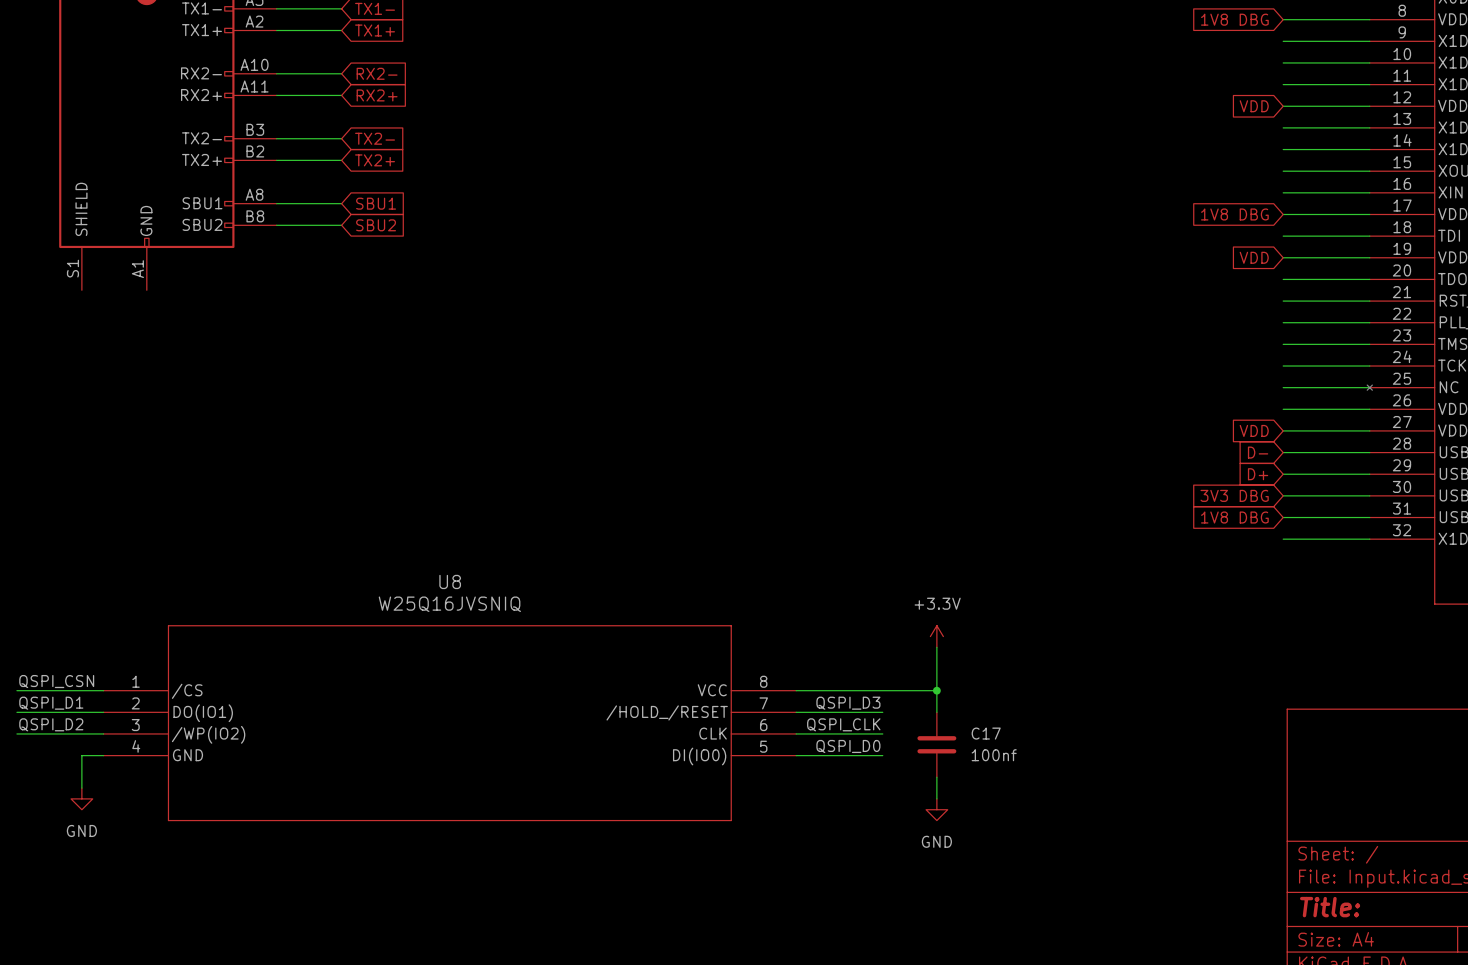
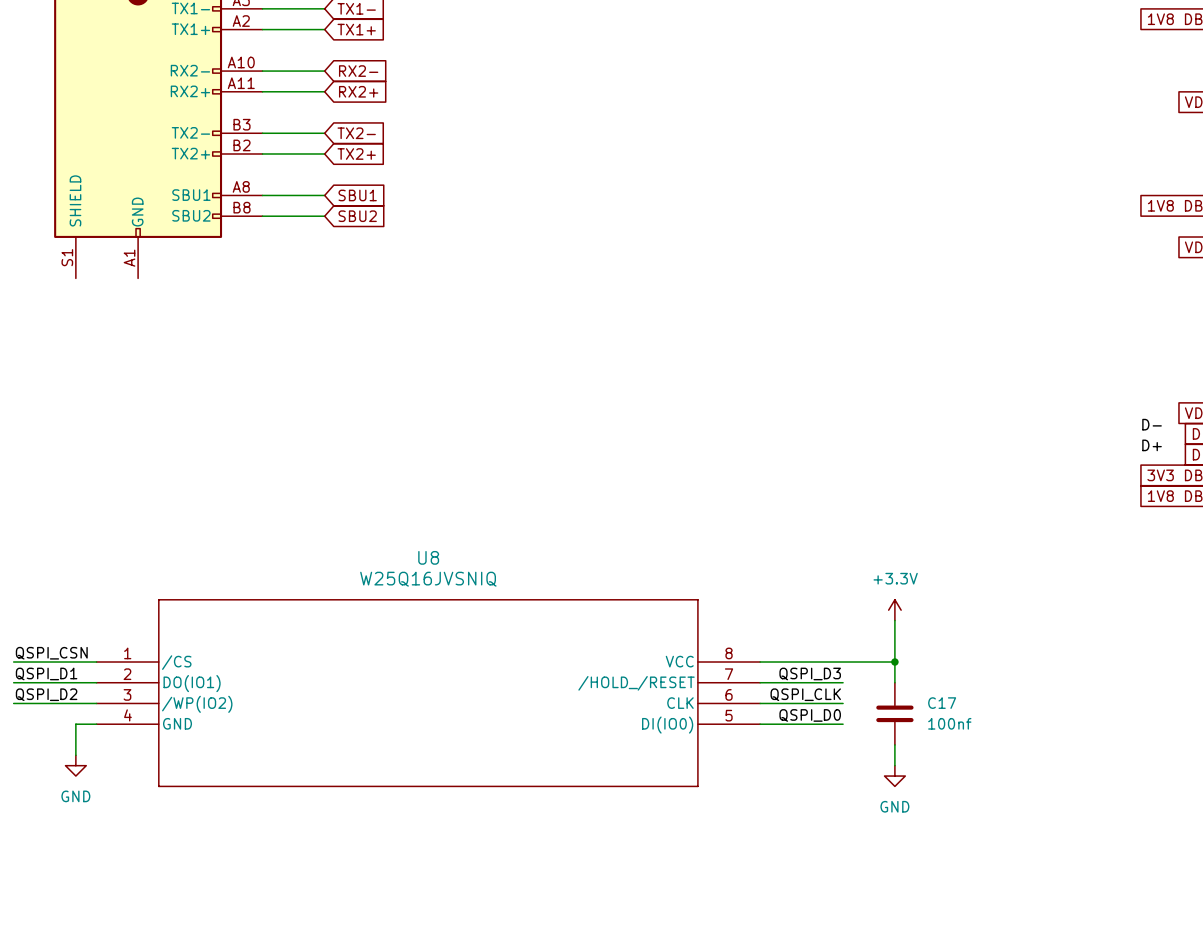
label: none -> D- (1152, 424)
label: none -> D+ (1152, 445)

